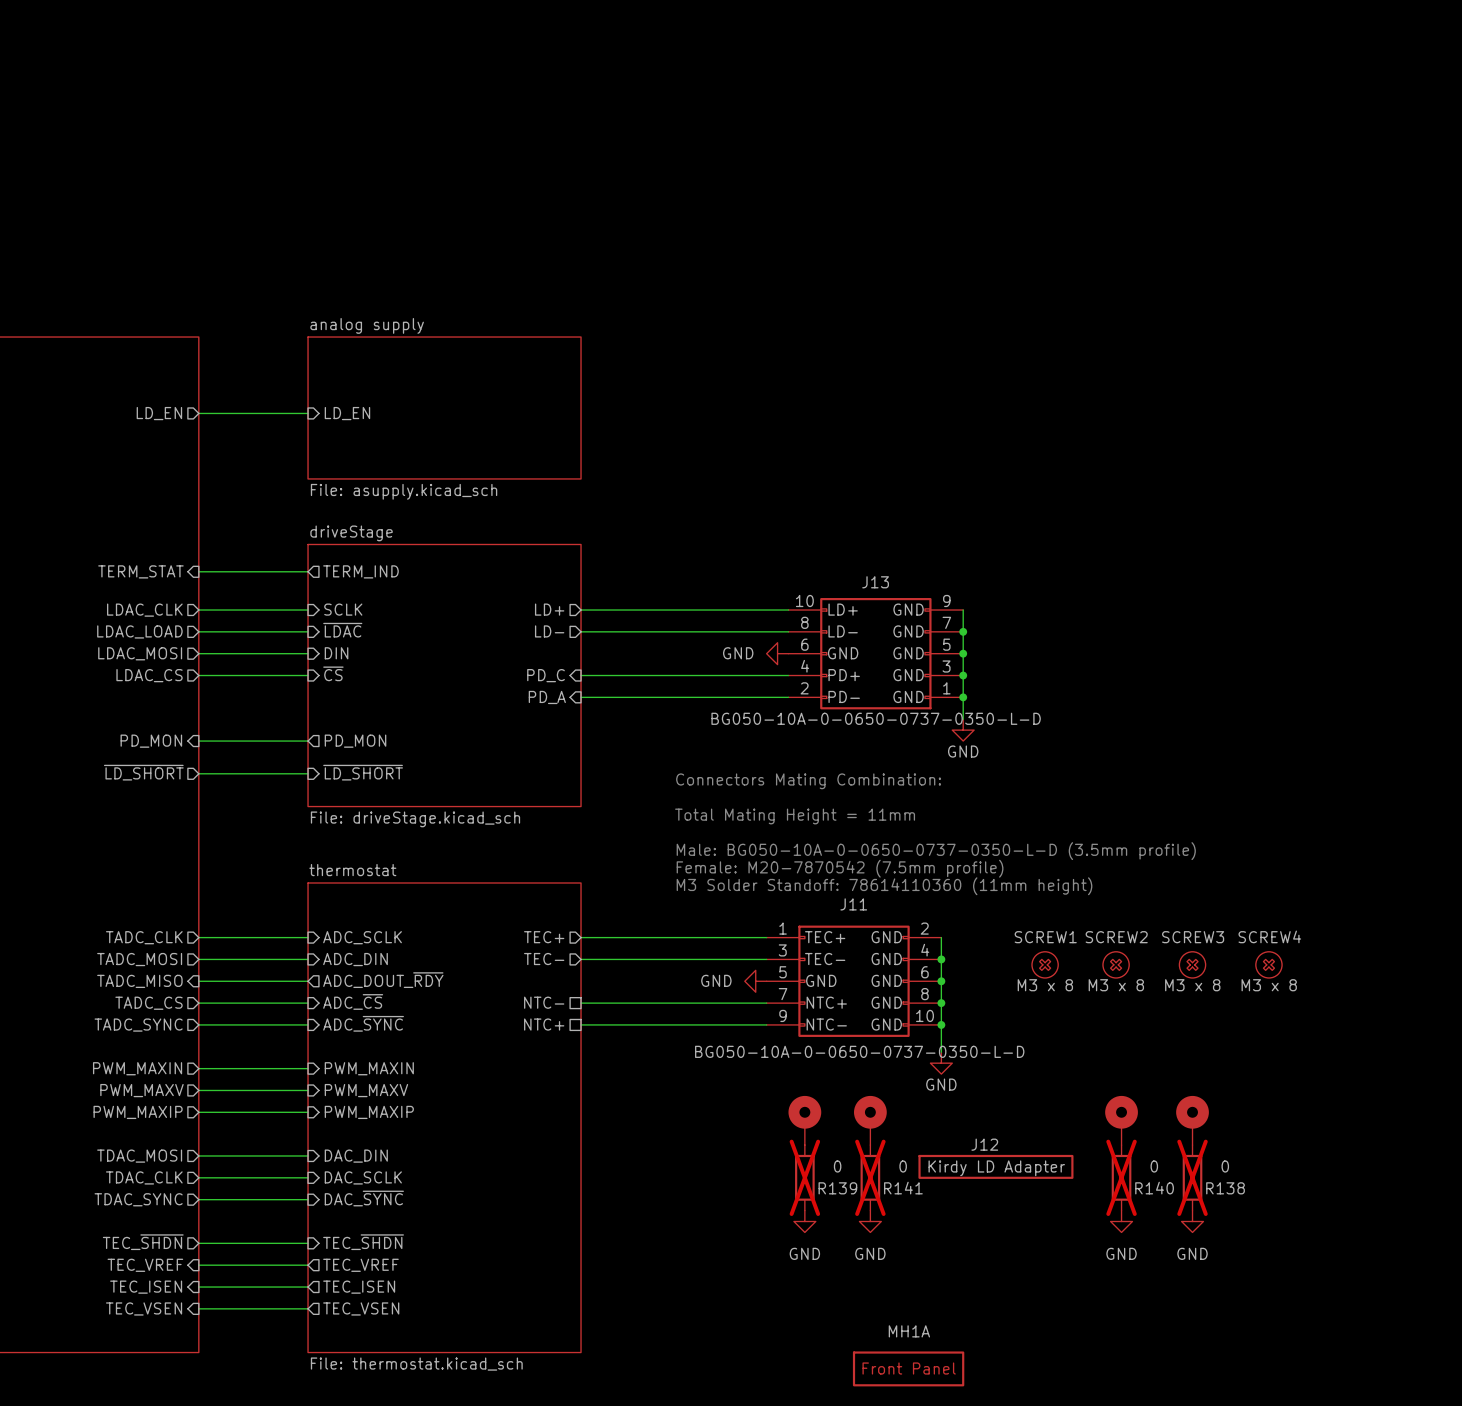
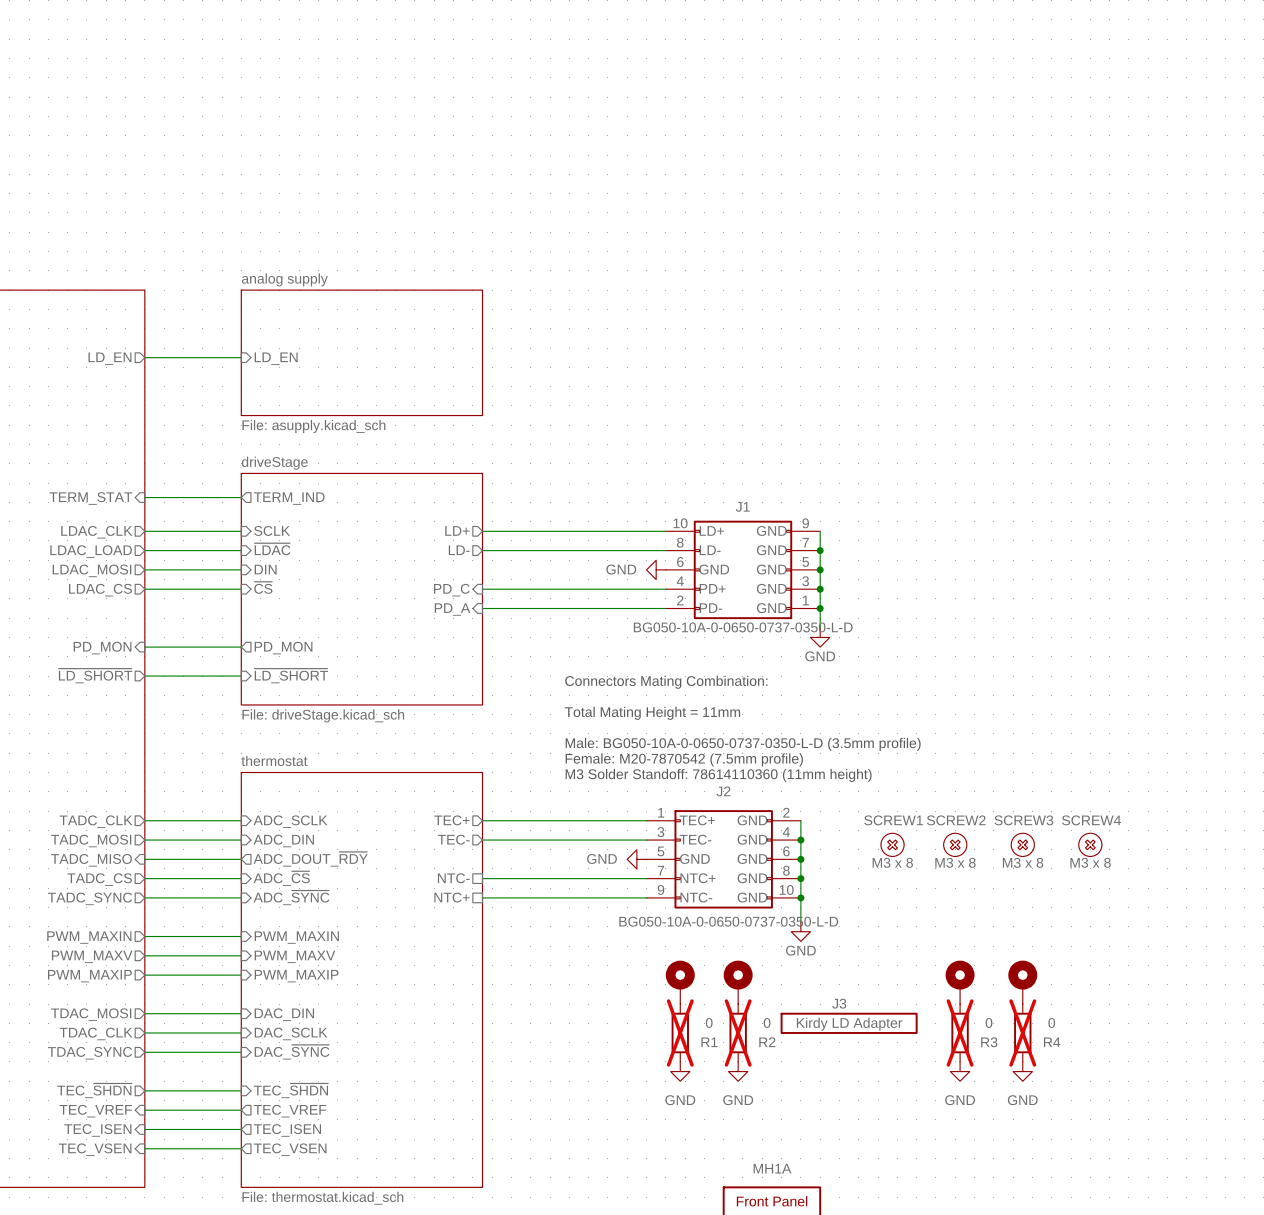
J13 name: J13 (875, 582) -> J1 (742, 506)
J11 name: J11 (853, 904) -> J2 (723, 791)
J12 name: J12 (984, 1144) -> J3 (839, 1003)
R139 name: R139 (837, 1188) -> R1 (709, 1042)
R141 name: R141 (903, 1188) -> R2 (767, 1042)
R140 name: R140 (1154, 1188) -> R3 (989, 1042)
R138 name: R138 (1225, 1188) -> R4 (1052, 1042)

